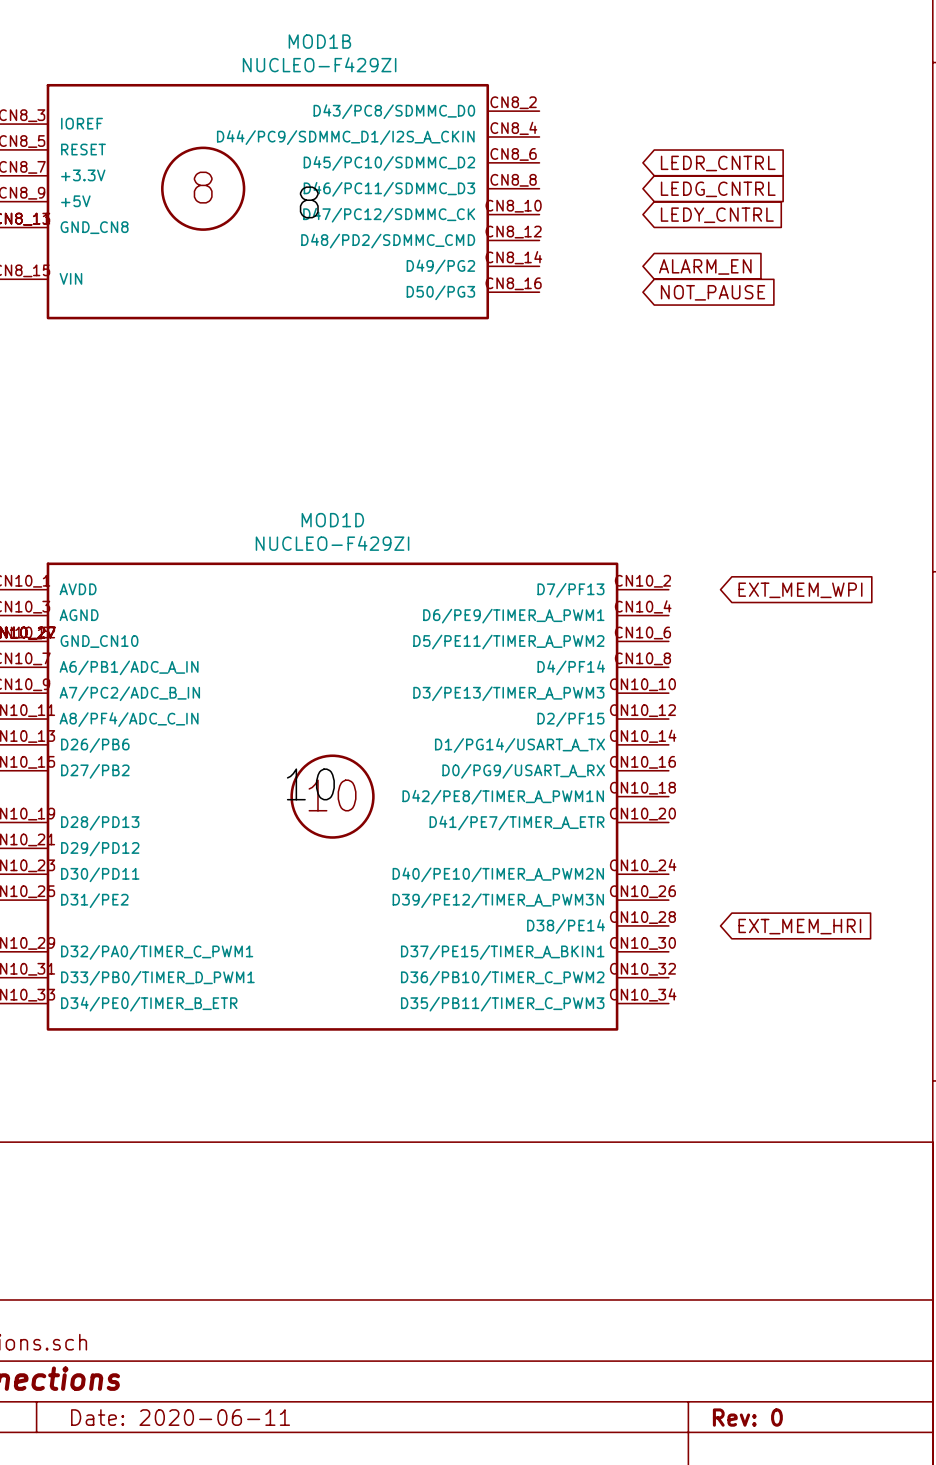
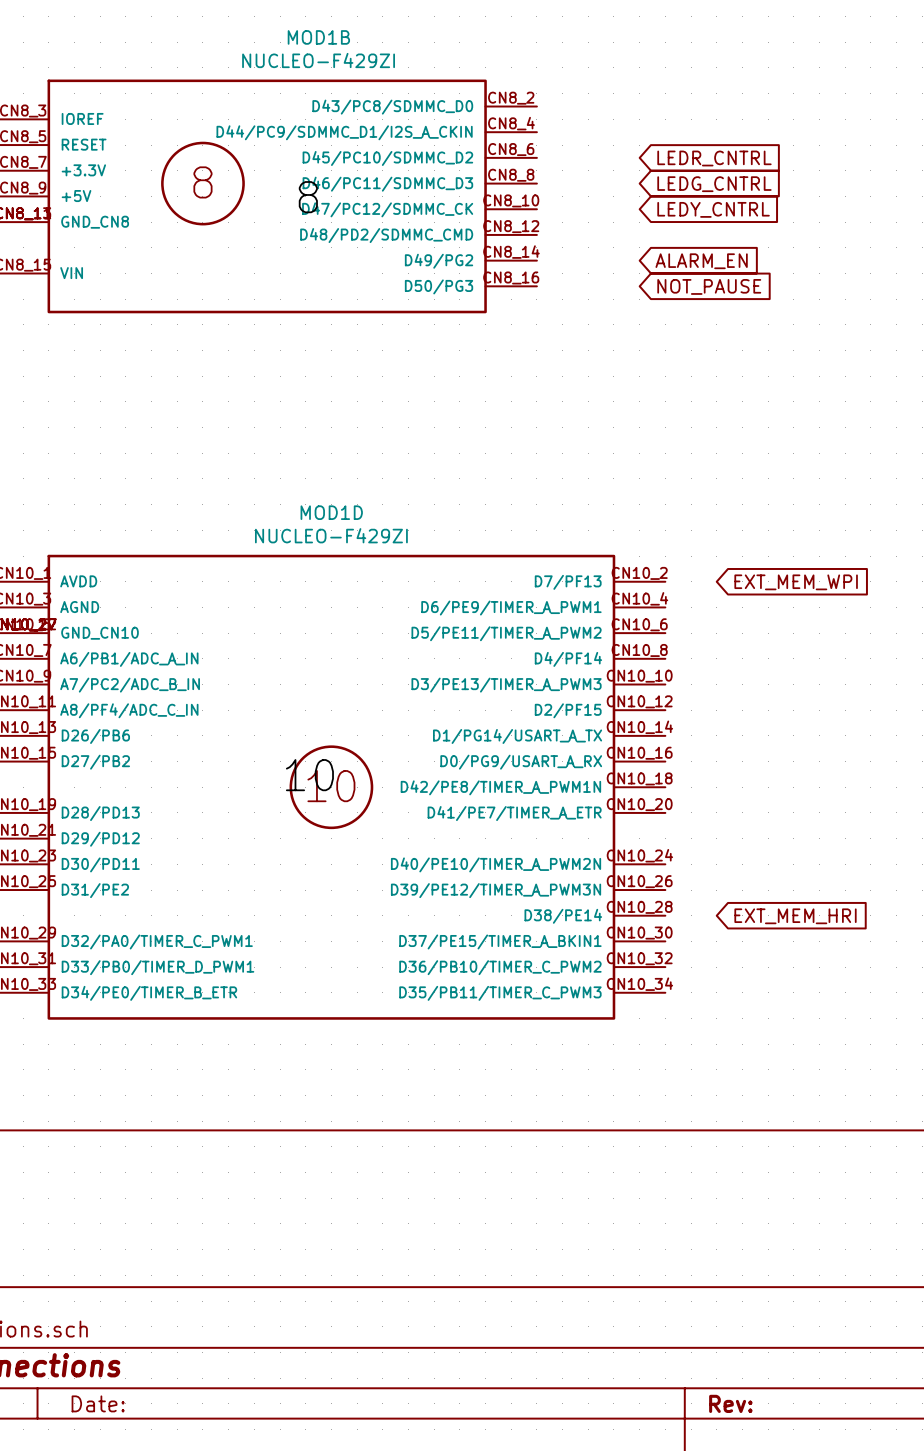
title block: Date: 2020-06-11 (180, 1417) -> Date: (98, 1403)
title block: Rev: 0 (747, 1417) -> Rev: (730, 1403)

